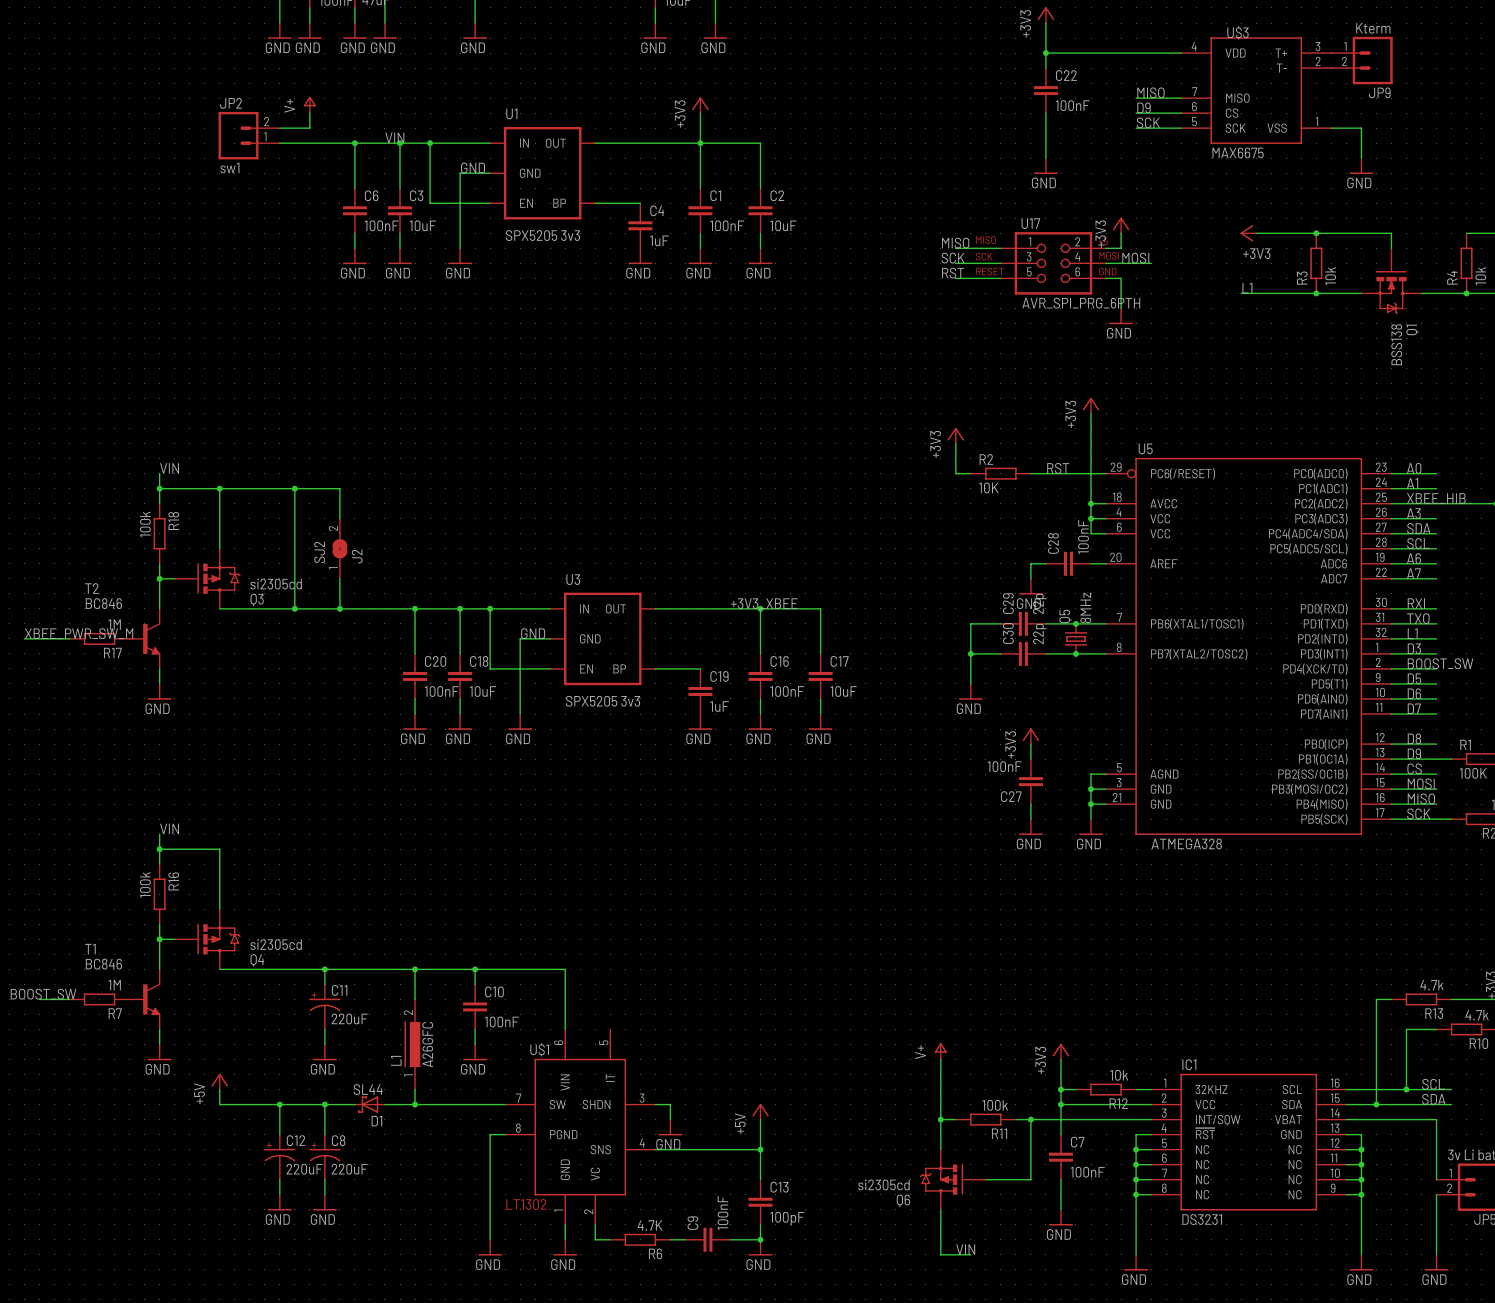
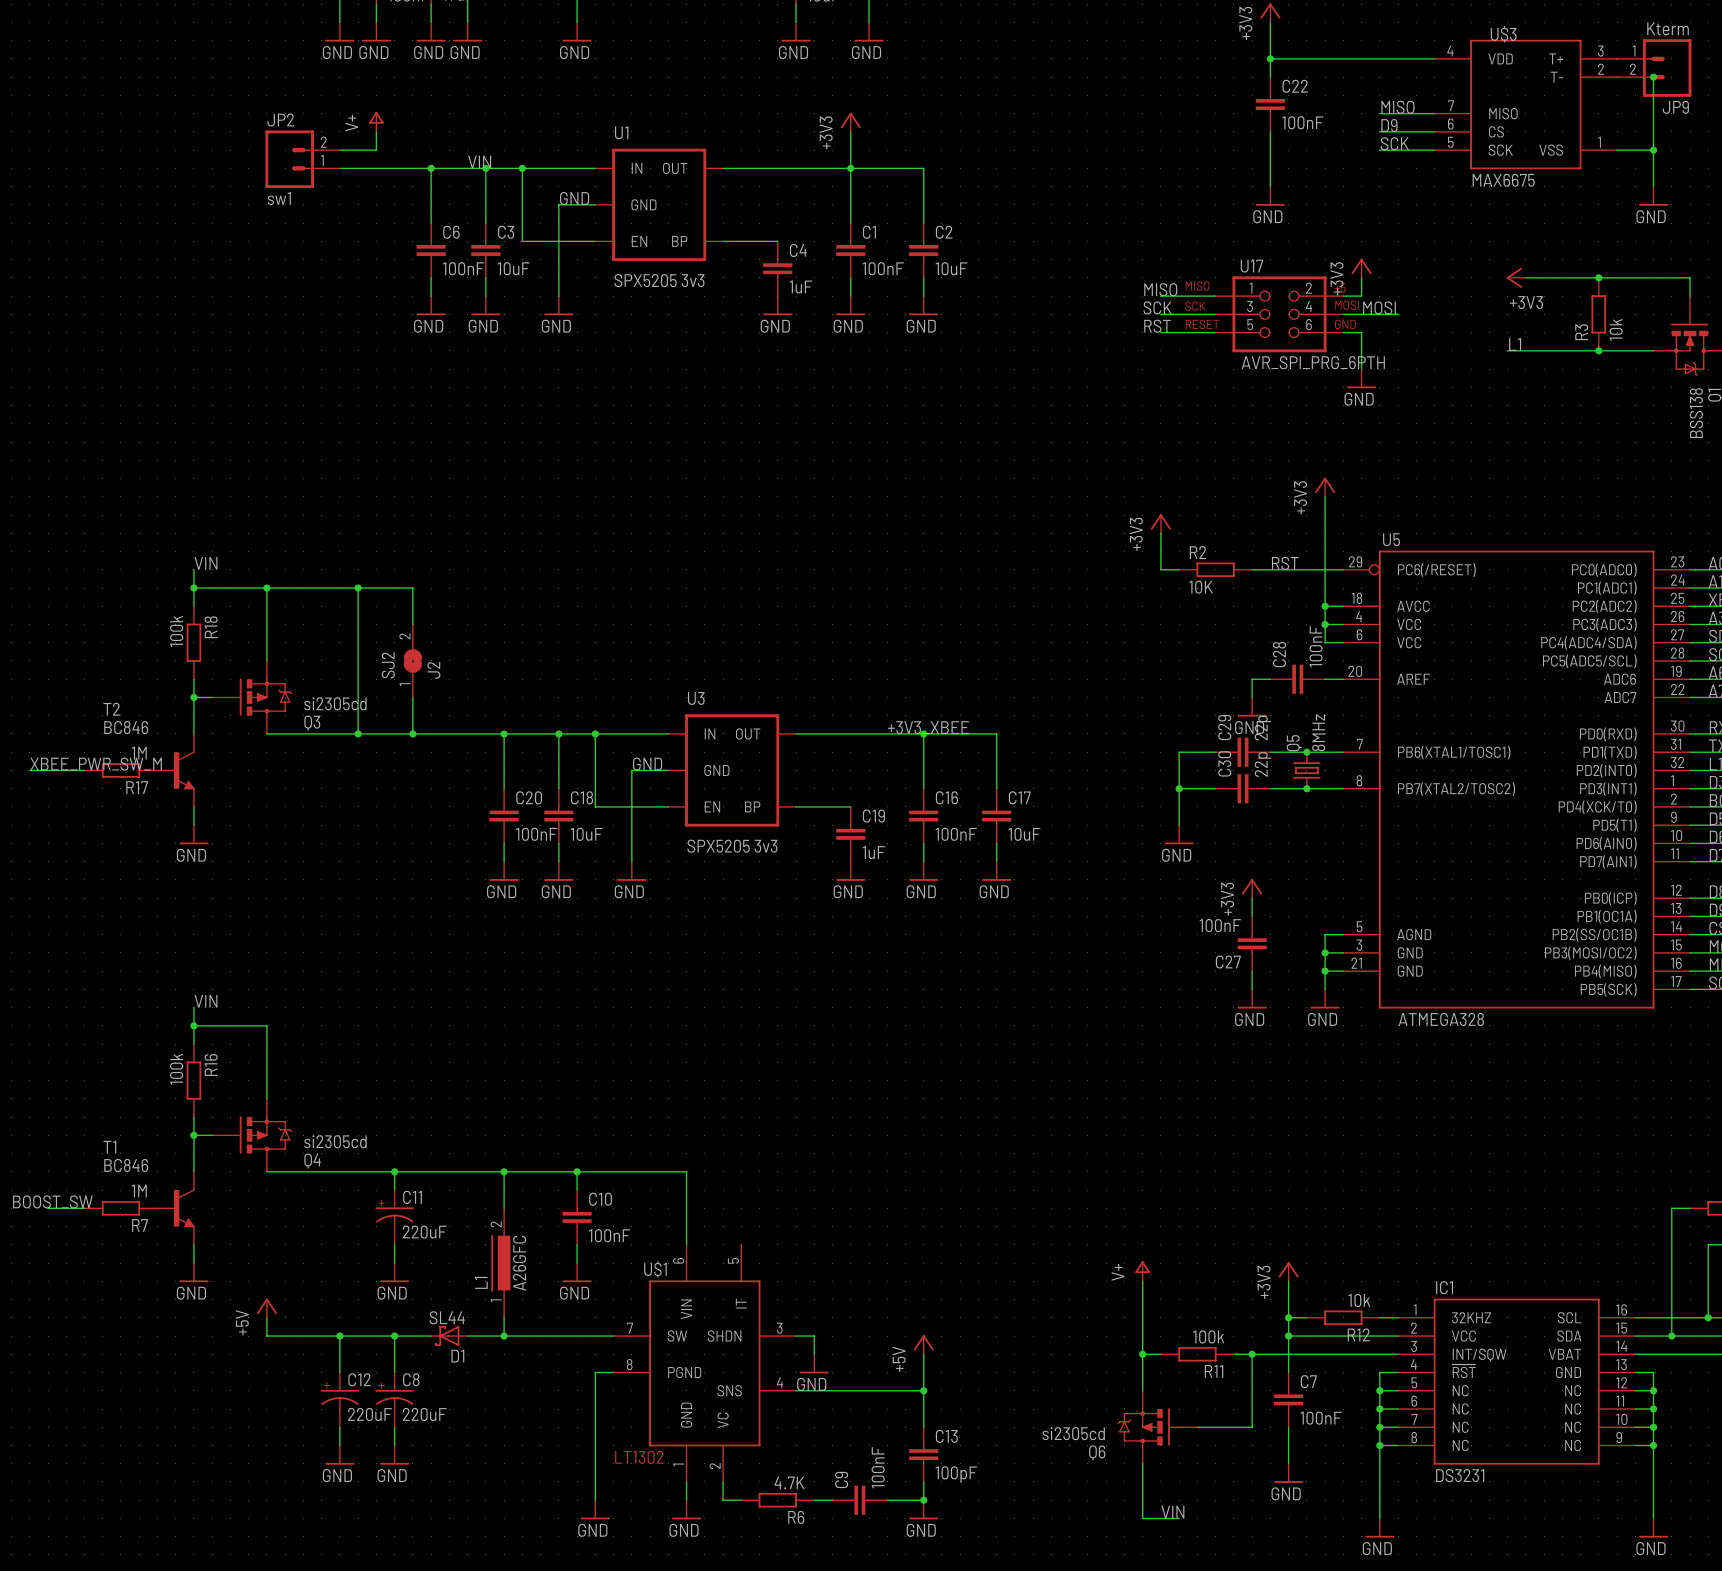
wire: none -> (1653, 77) (1653, 150)
junction: none -> (1653, 77)
junction: none -> (1653, 150)

